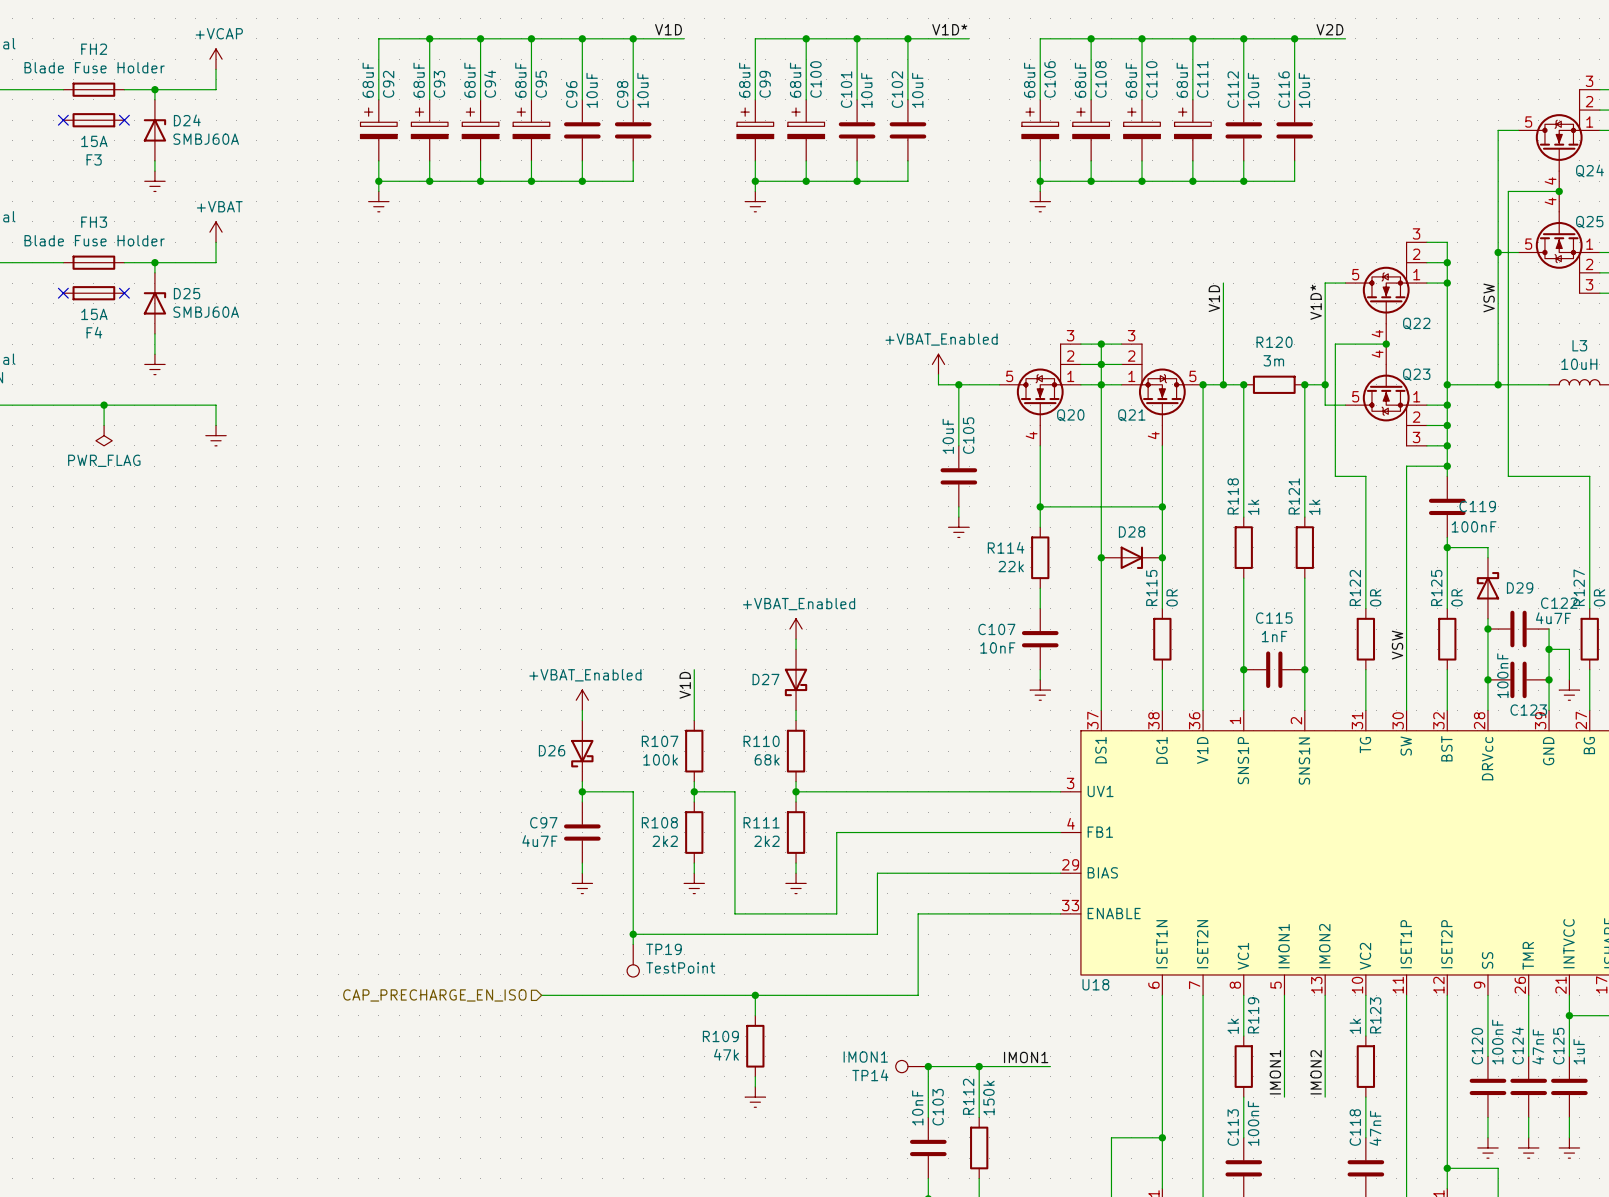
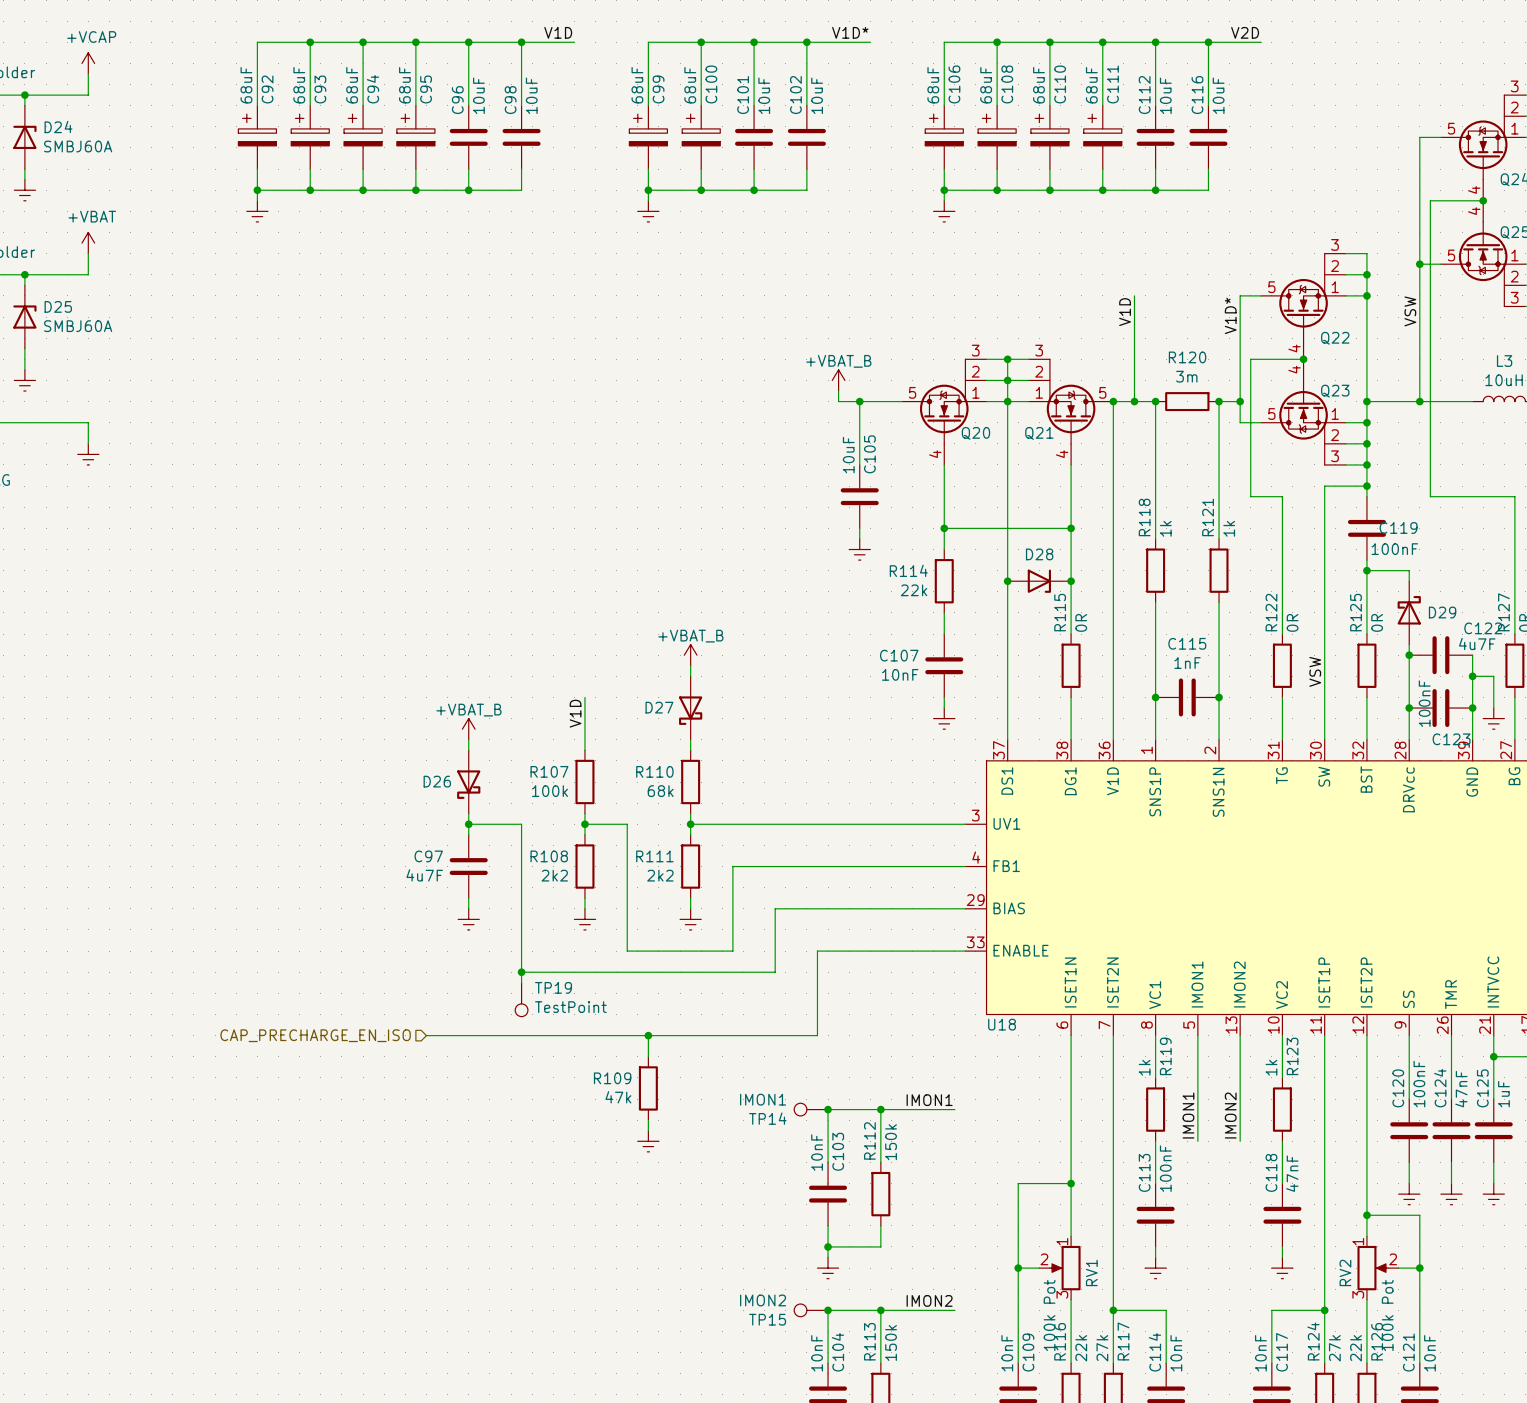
power symbol: +VBAT_Enabled (938, 364) -> +VBAT_B (838, 380)
power symbol: +VBAT_Enabled (796, 629) -> +VBAT_B (690, 655)
power symbol: +VBAT_Enabled (582, 700) -> +VBAT_B (468, 729)

